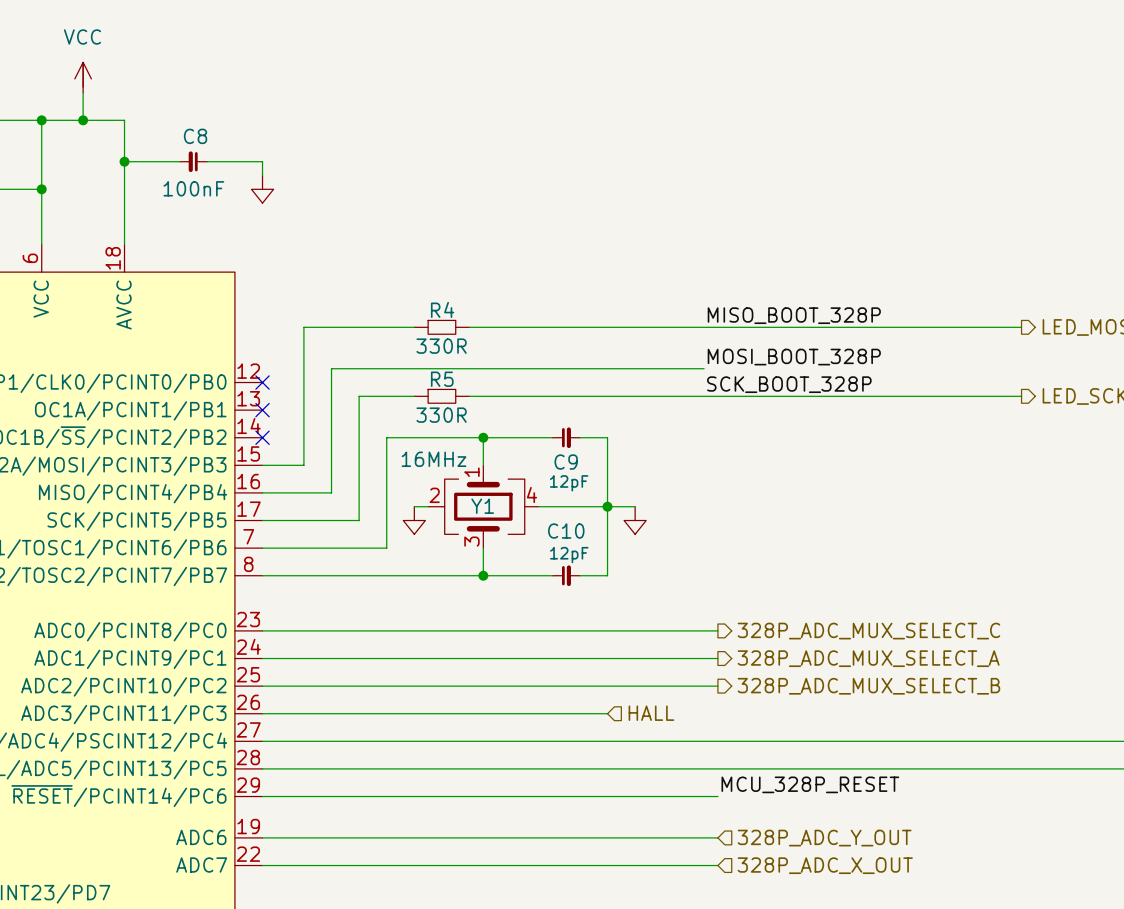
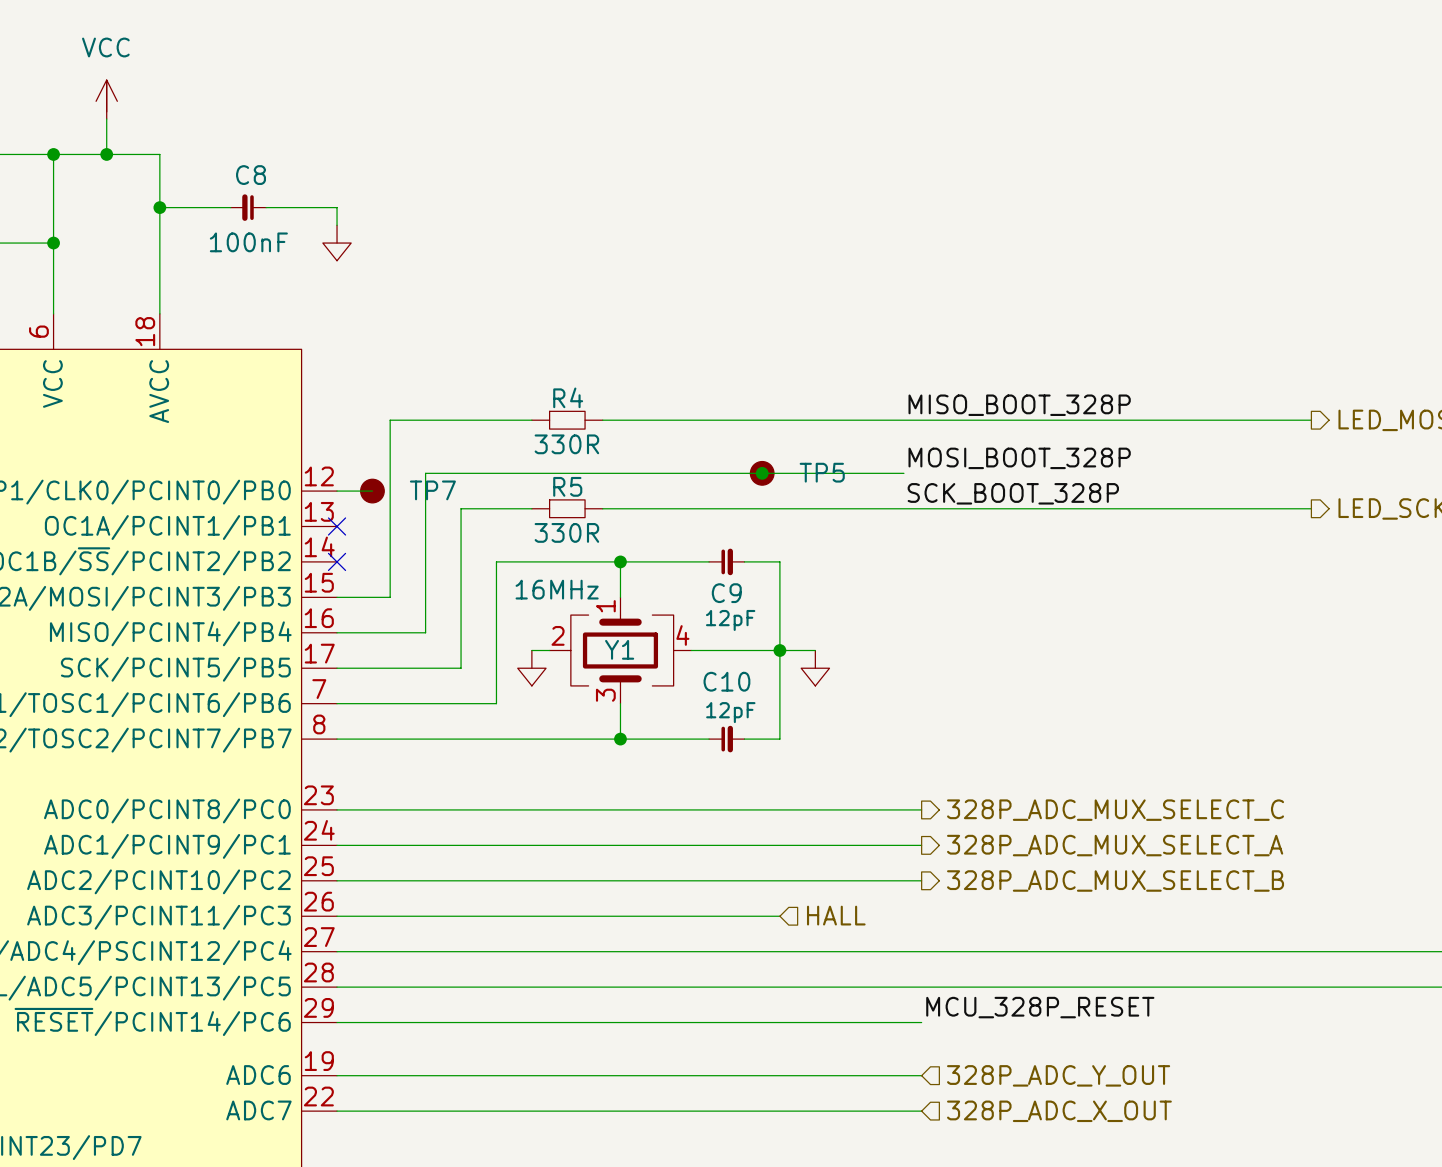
junction: none -> (762, 473)
TP5: none -> (762, 473)
wire: none -> (337, 491) (372, 491)
no-connect mark: (262, 382) -> none
TP7: none -> (372, 491)

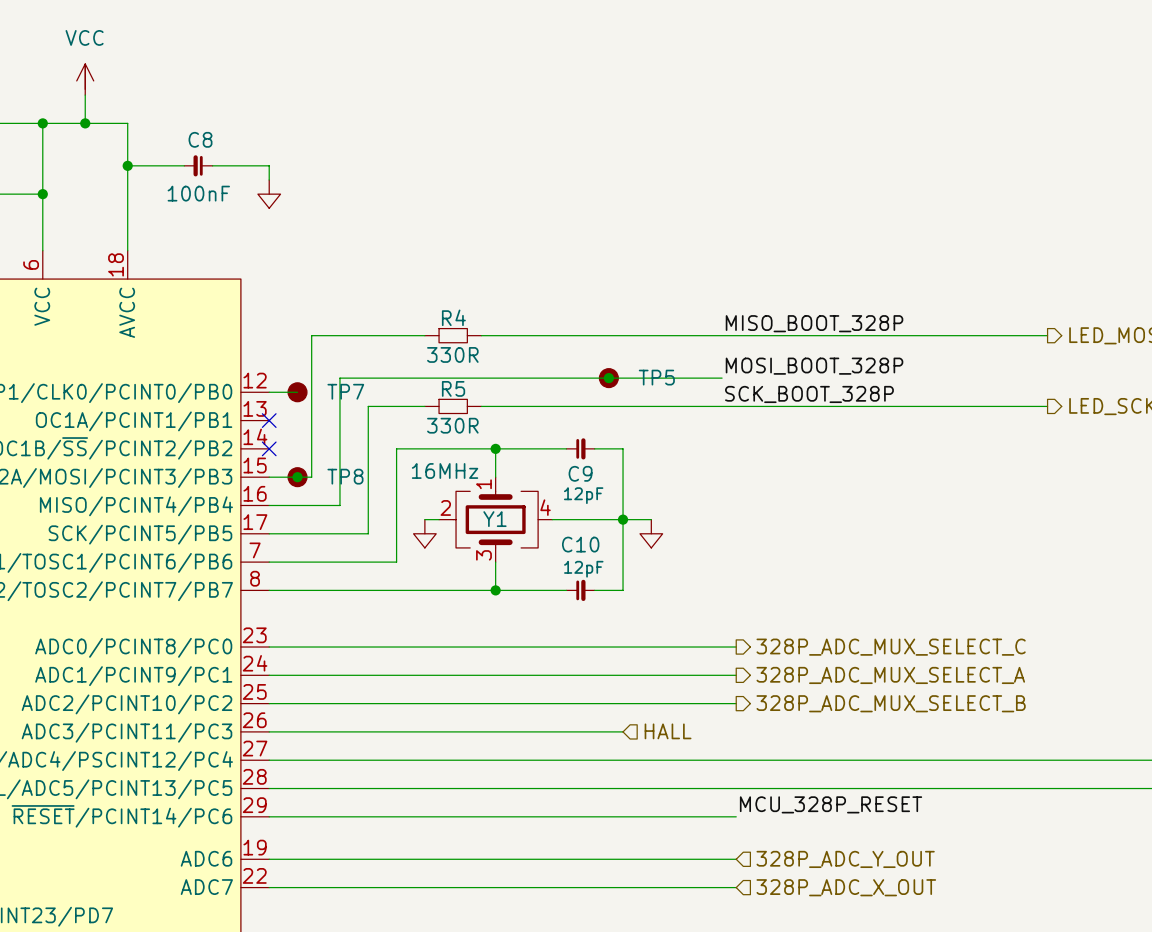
junction: none -> (297, 477)
TP8: none -> (297, 477)

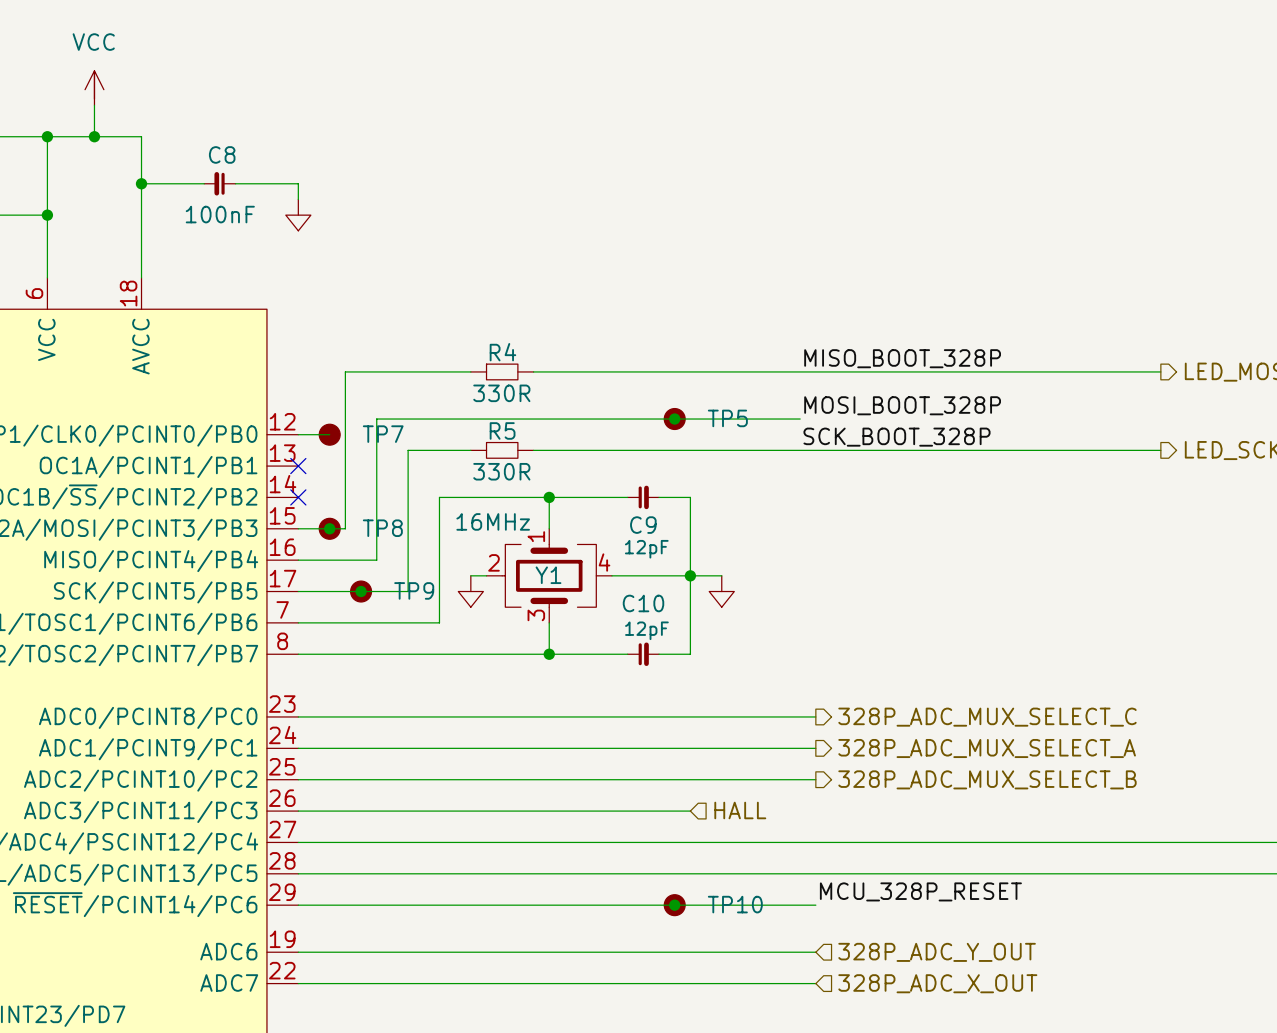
junction: none -> (361, 591)
TP9: none -> (361, 591)
junction: none -> (674, 905)
TP10: none -> (674, 905)

